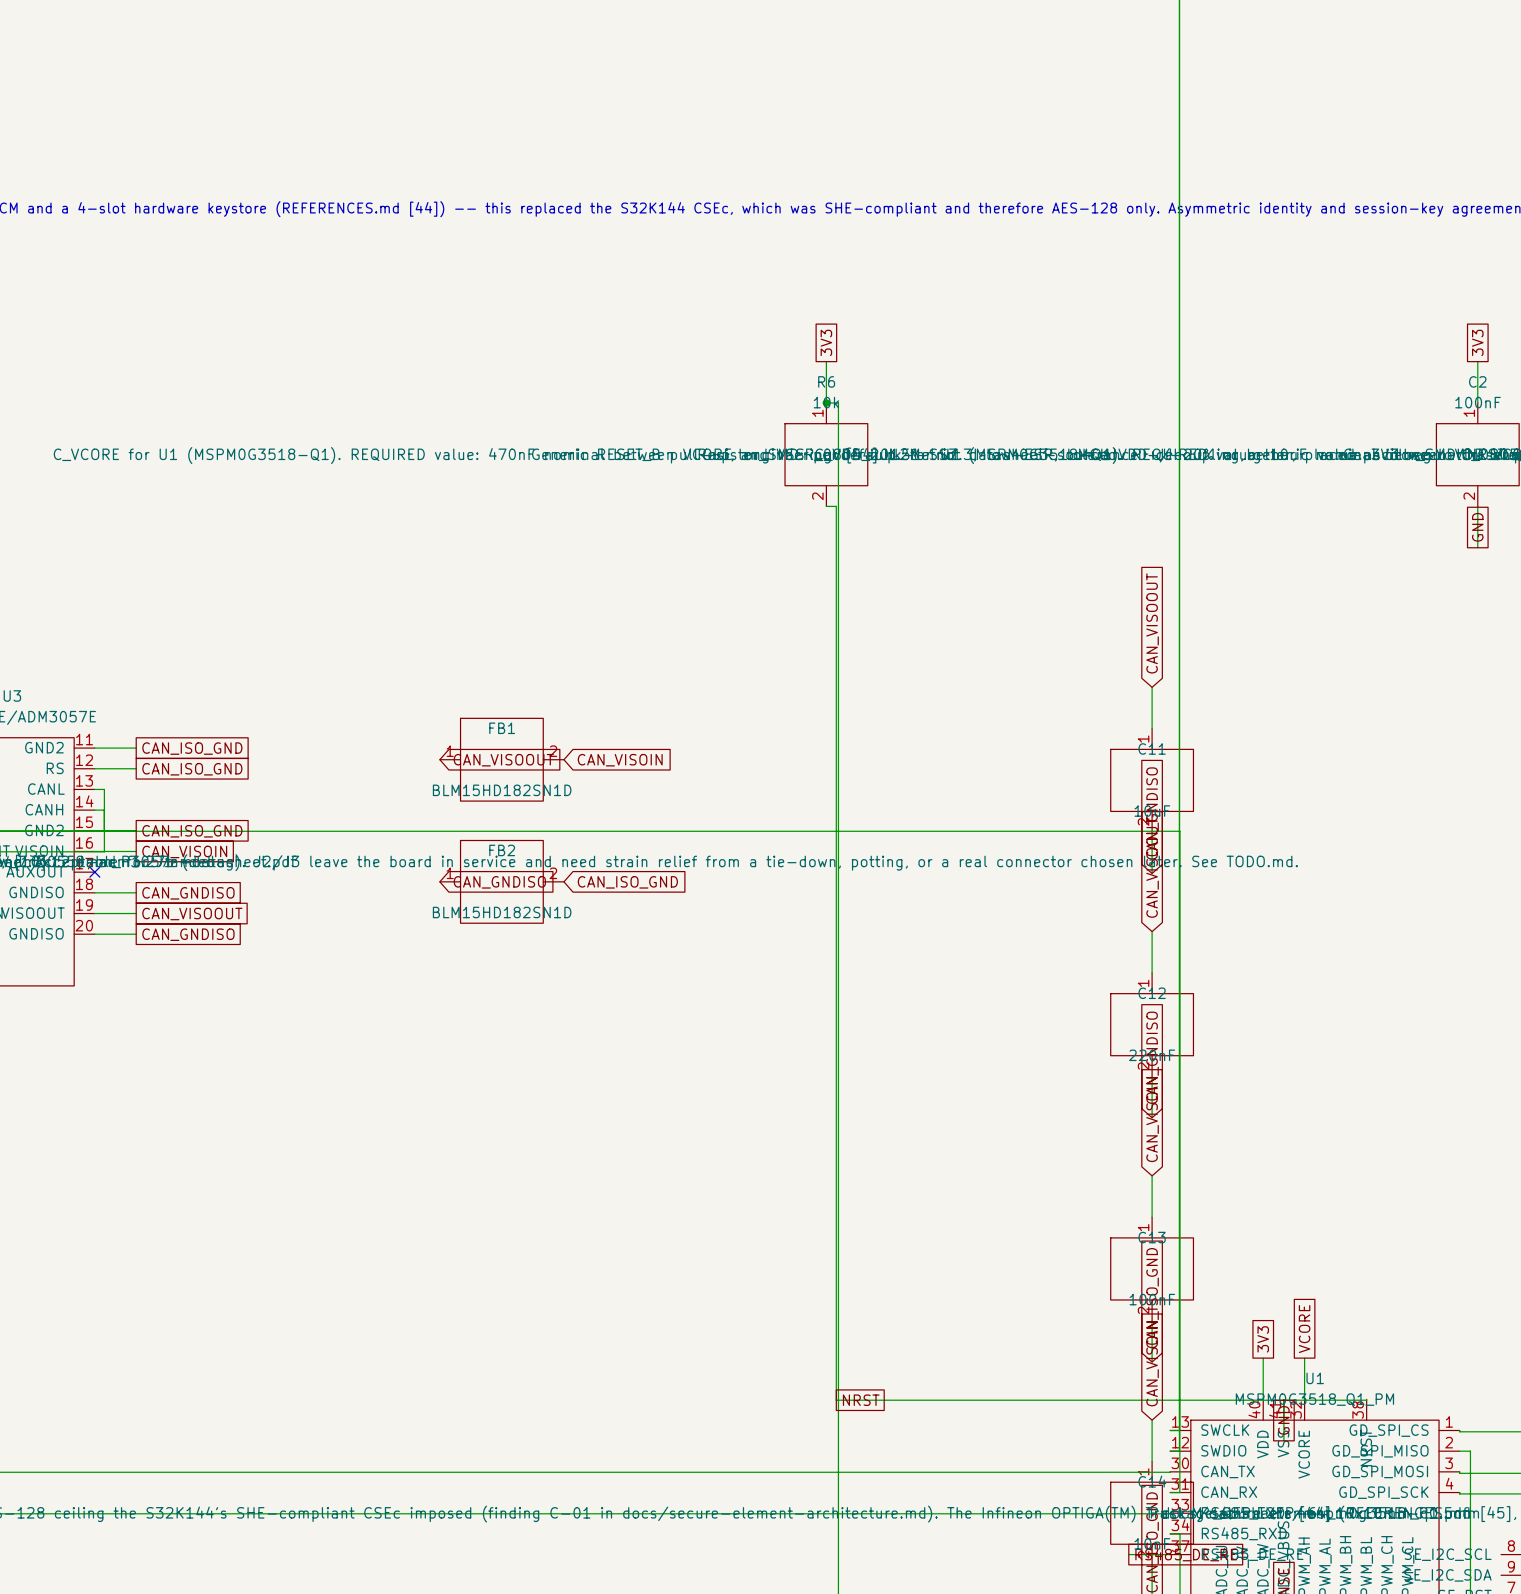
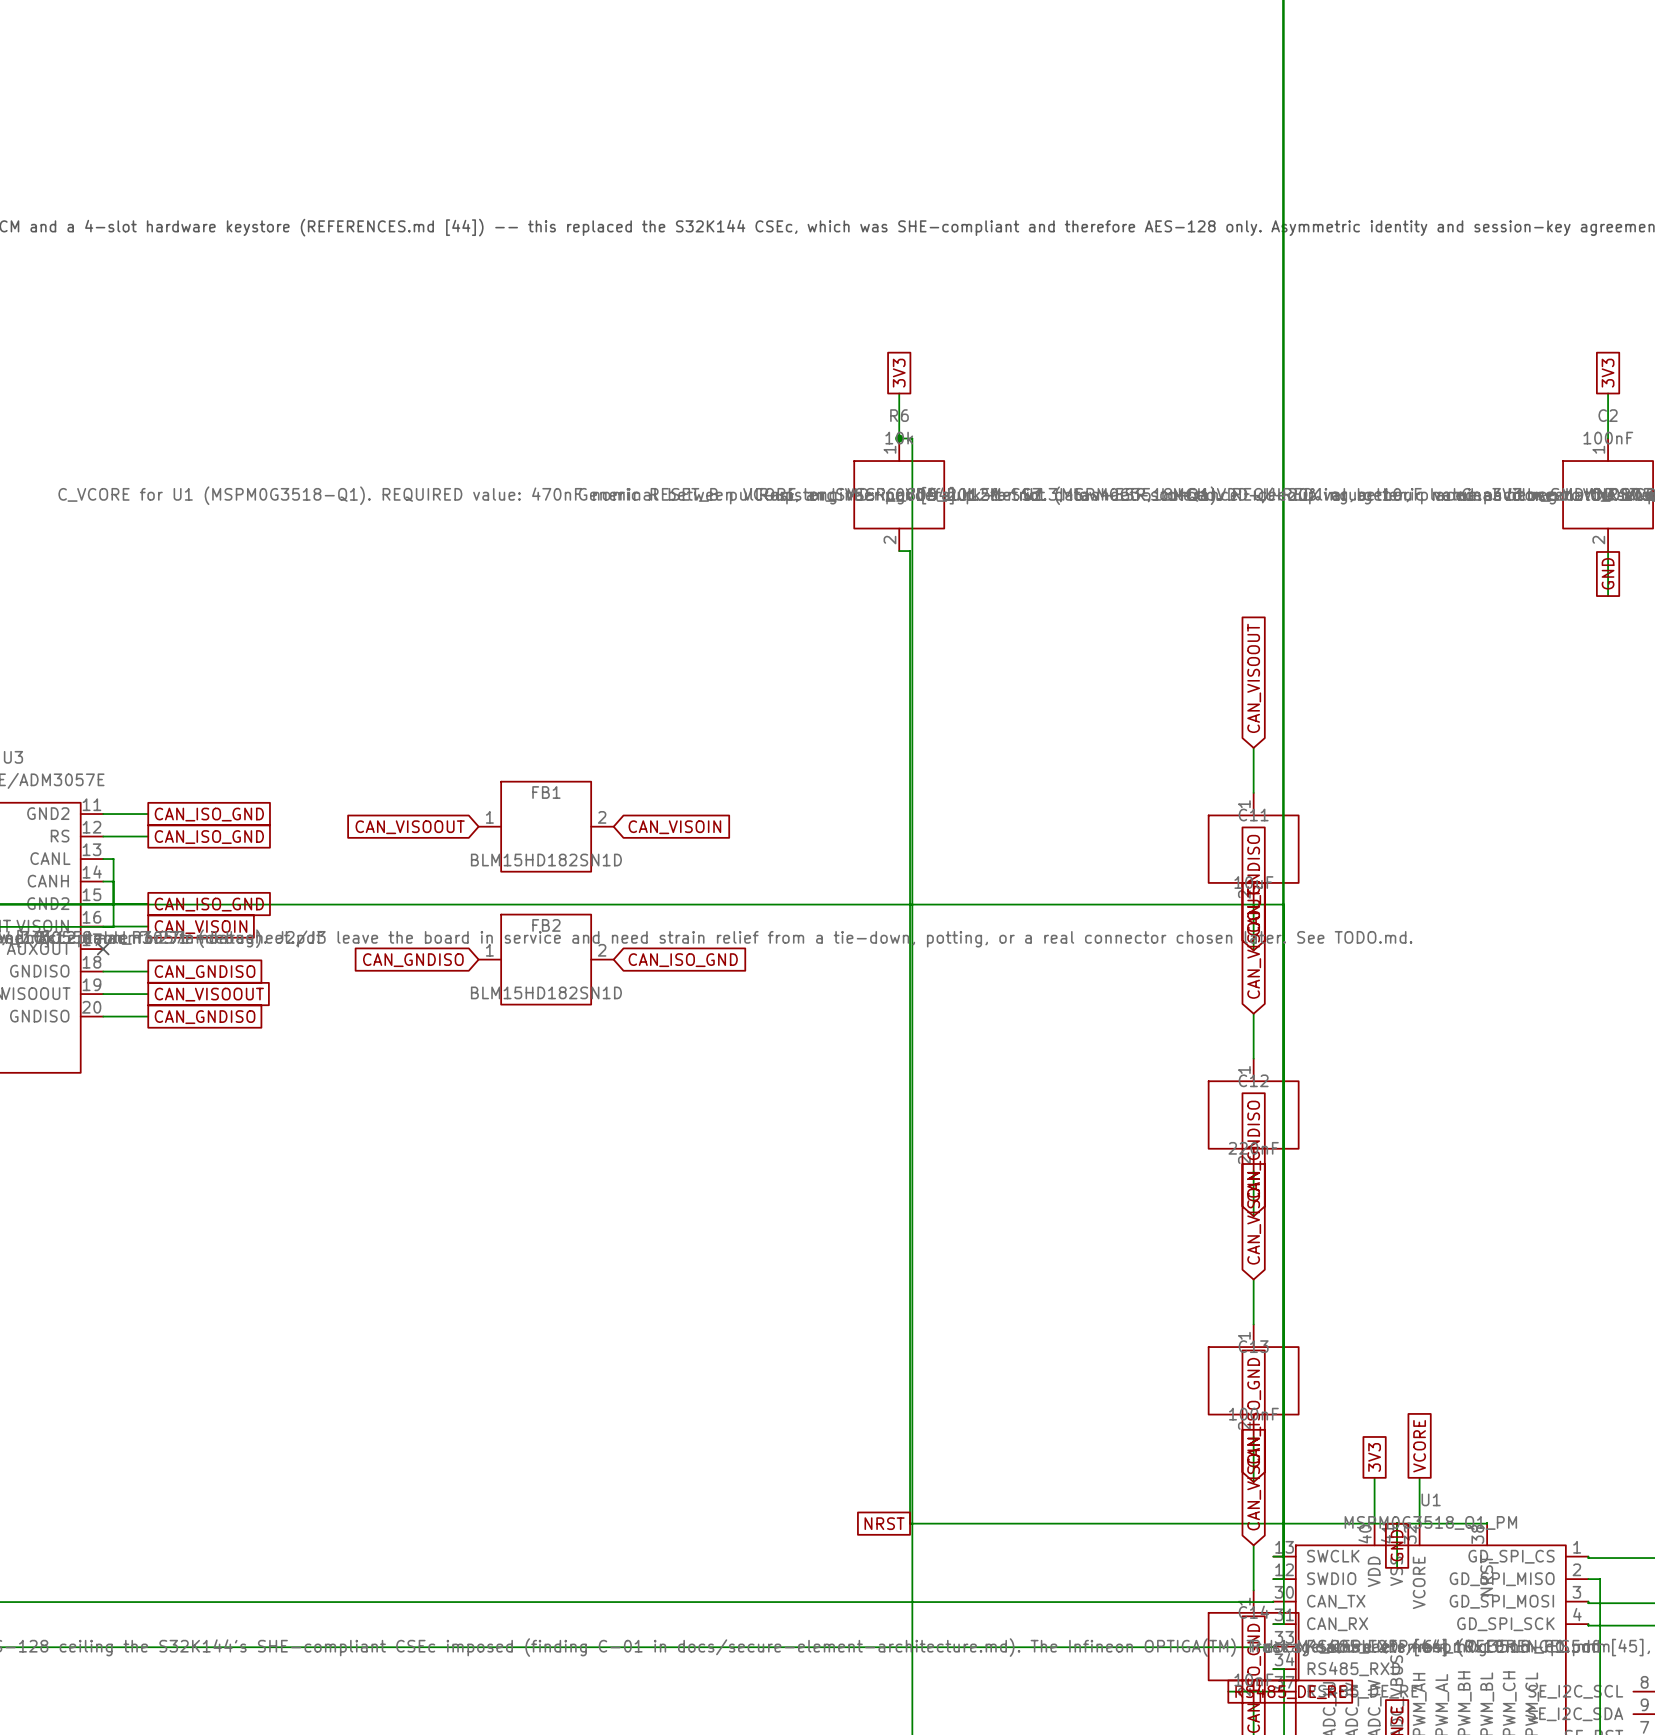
global label rotation: 0° (503, 760) -> 180° (410, 827)
global label rotation: 0° (499, 882) -> 180° (413, 960)
global label rotation: 0° (861, 1400) -> 180° (884, 1523)

